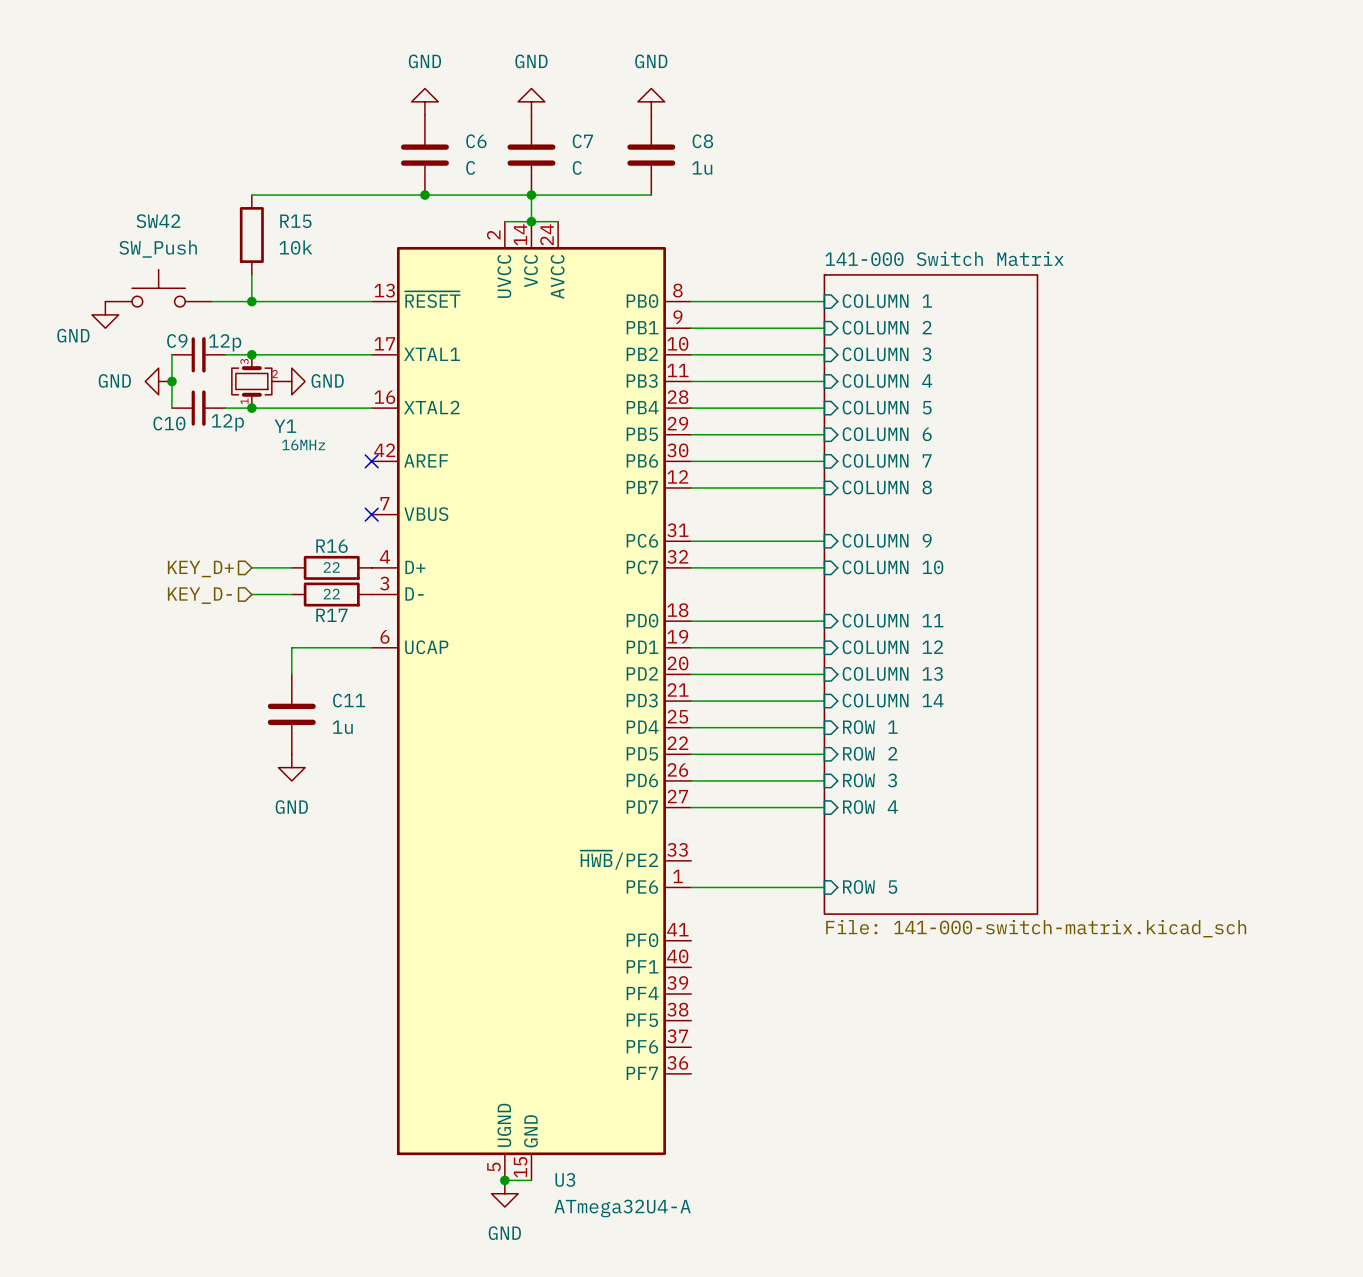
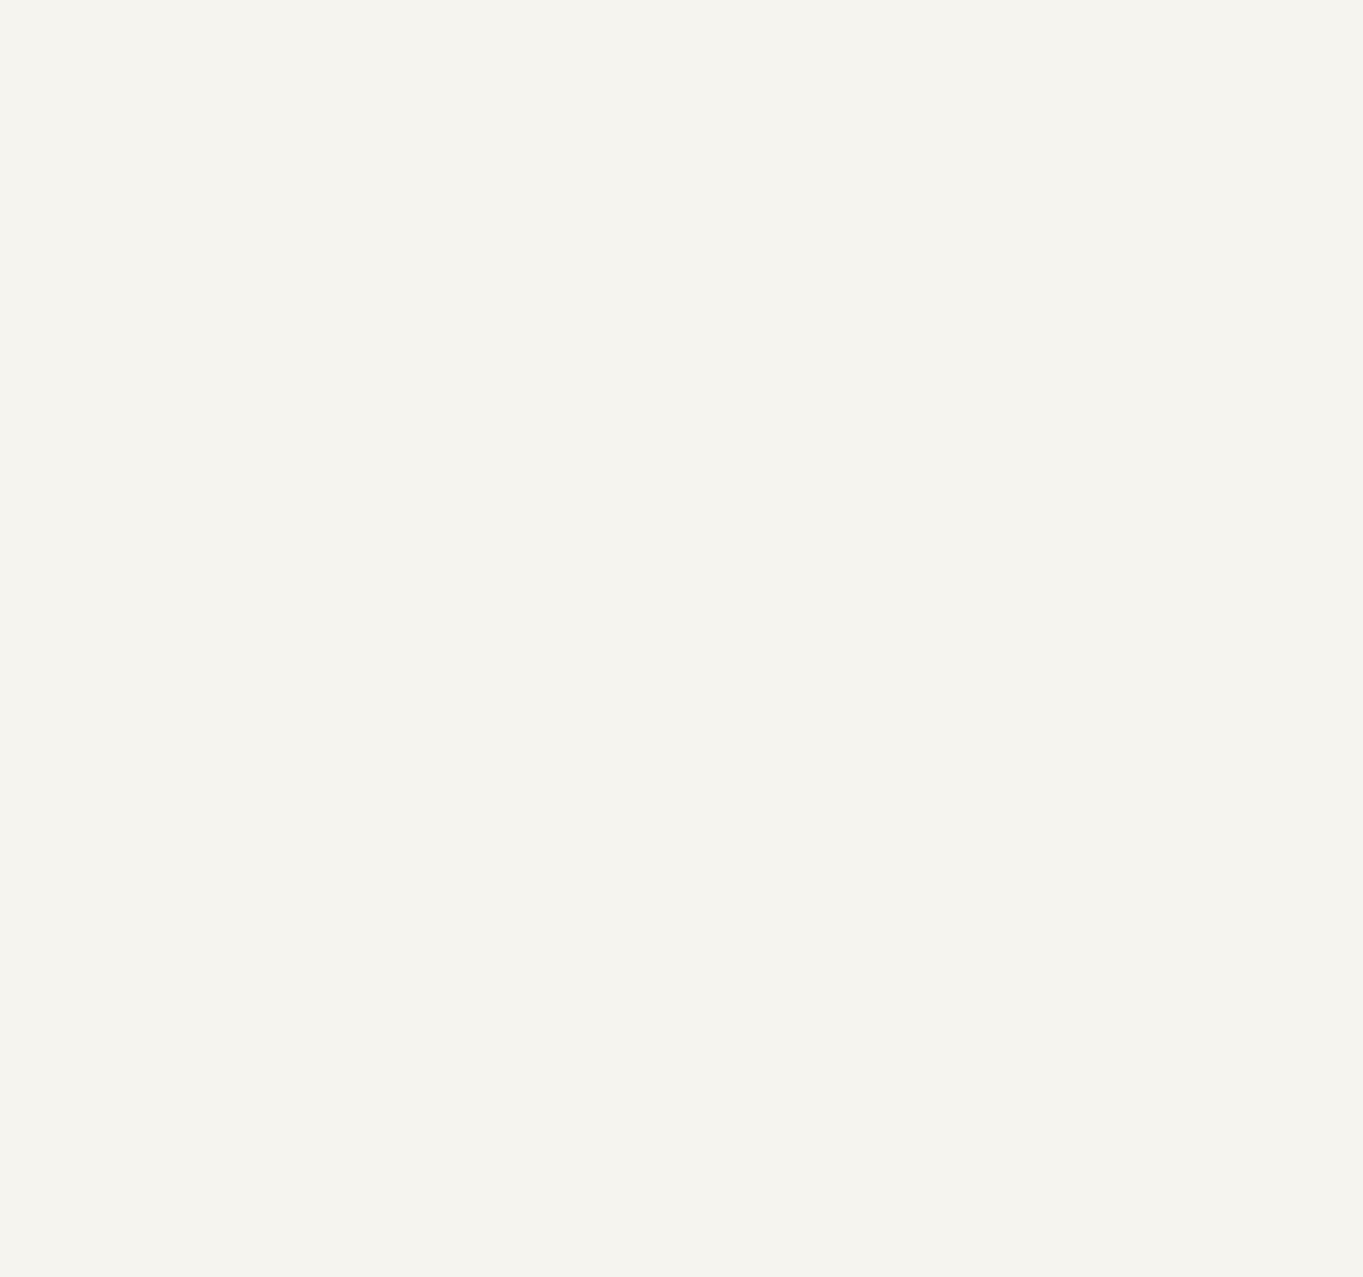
power symbol: GND (424, 101) -> none
power symbol: GND (531, 101) -> none
power symbol: GND (651, 101) -> none
C6: C (424, 155) -> none
C7: C (531, 155) -> none
C8: 1u (651, 155) -> none
wire: (251, 195) (651, 195) -> none
junction: (424, 195) -> none
wire: (531, 195) (531, 221) -> none
junction: (531, 195) -> none
wire: (504, 221) (558, 221) -> none
junction: (531, 221) -> none
R15: 10k (251, 235) -> none
wire: (251, 274) (251, 301) -> none
SW42: SW_Push (158, 288) -> none
wire: (211, 301) (371, 301) -> none
junction: (251, 301) -> none
wire: (691, 301) (824, 301) -> none
sheet pin: COLUMN 1 (887, 301) -> none
power symbol: GND (105, 314) -> none
sheet pin: COLUMN 2 (887, 327) -> none
wire: (691, 328) (824, 328) -> none
wire: (171, 354) (171, 408) -> none
C9: 12p (198, 354) -> none
wire: (225, 354) (371, 354) -> none
junction: (251, 354) -> none
wire: (691, 354) (824, 354) -> none
sheet pin: COLUMN 3 (887, 354) -> none
sheet pin: COLUMN 4 (887, 380) -> none
power symbol: GND (158, 381) -> none
junction: (171, 381) -> none
Y1: 16MHz (255, 381) -> none
power symbol: GND (291, 381) -> none
wire: (691, 381) (824, 381) -> none
sheet pin: COLUMN 5 (887, 407) -> none
C10: 12p (198, 408) -> none
wire: (225, 408) (371, 408) -> none
junction: (251, 408) -> none
wire: (691, 408) (824, 408) -> none
wire: (691, 434) (824, 434) -> none
sheet pin: COLUMN 6 (887, 434) -> none
sheet pin: COLUMN 7 (887, 460) -> none
no-connect mark: (371, 461) -> none
wire: (691, 461) (824, 461) -> none
sheet pin: COLUMN 8 (887, 487) -> none
wire: (691, 488) (824, 488) -> none
no-connect mark: (371, 514) -> none
sheet pin: COLUMN 9 (887, 540) -> none
wire: (691, 541) (824, 541) -> none
wire: (251, 567) (291, 567) -> none
R16: 22 (331, 567) -> none
wire: (691, 567) (824, 567) -> none
sheet pin: COLUMN 10 (892, 567) -> none
hierarchical label: KEY_D+ (200, 569) -> none
wire: (251, 594) (291, 594) -> none
R17: 22 (331, 594) -> none
sheet 141-000 Switch Matrix: File: 141-000-switch-matrix.kicad_sch (930, 594) -> none
hierarchical label: KEY_D- (199, 595) -> none
sheet pin: COLUMN 11 (893, 620) -> none
wire: (691, 621) (824, 621) -> none
wire: (371, 647) (291, 647) (291, 674) -> none
wire: (691, 647) (824, 647) -> none
sheet pin: COLUMN 12 (892, 647) -> none
sheet pin: COLUMN 13 (892, 673) -> none
wire: (691, 674) (824, 674) -> none
sheet pin: COLUMN 14 (893, 700) -> none
U3: ATmega32U4-A (531, 701) -> none
wire: (691, 701) (824, 701) -> none
C11: 1u (291, 714) -> none
wire: (691, 727) (824, 727) -> none
sheet pin: ROW 1 (870, 727) -> none
sheet pin: ROW 2 (870, 753) -> none
wire: (691, 754) (824, 754) -> none
power symbol: GND (291, 767) -> none
wire: (691, 780) (824, 780) -> none
sheet pin: ROW 3 (870, 780) -> none
wire: (691, 807) (824, 807) -> none
sheet pin: ROW 4 (870, 807) -> none
sheet pin: ROW 5 (870, 886) -> none
wire: (691, 887) (824, 887) -> none
wire: (504, 1180) (531, 1180) -> none
junction: (504, 1180) -> none
power symbol: GND (504, 1193) -> none

